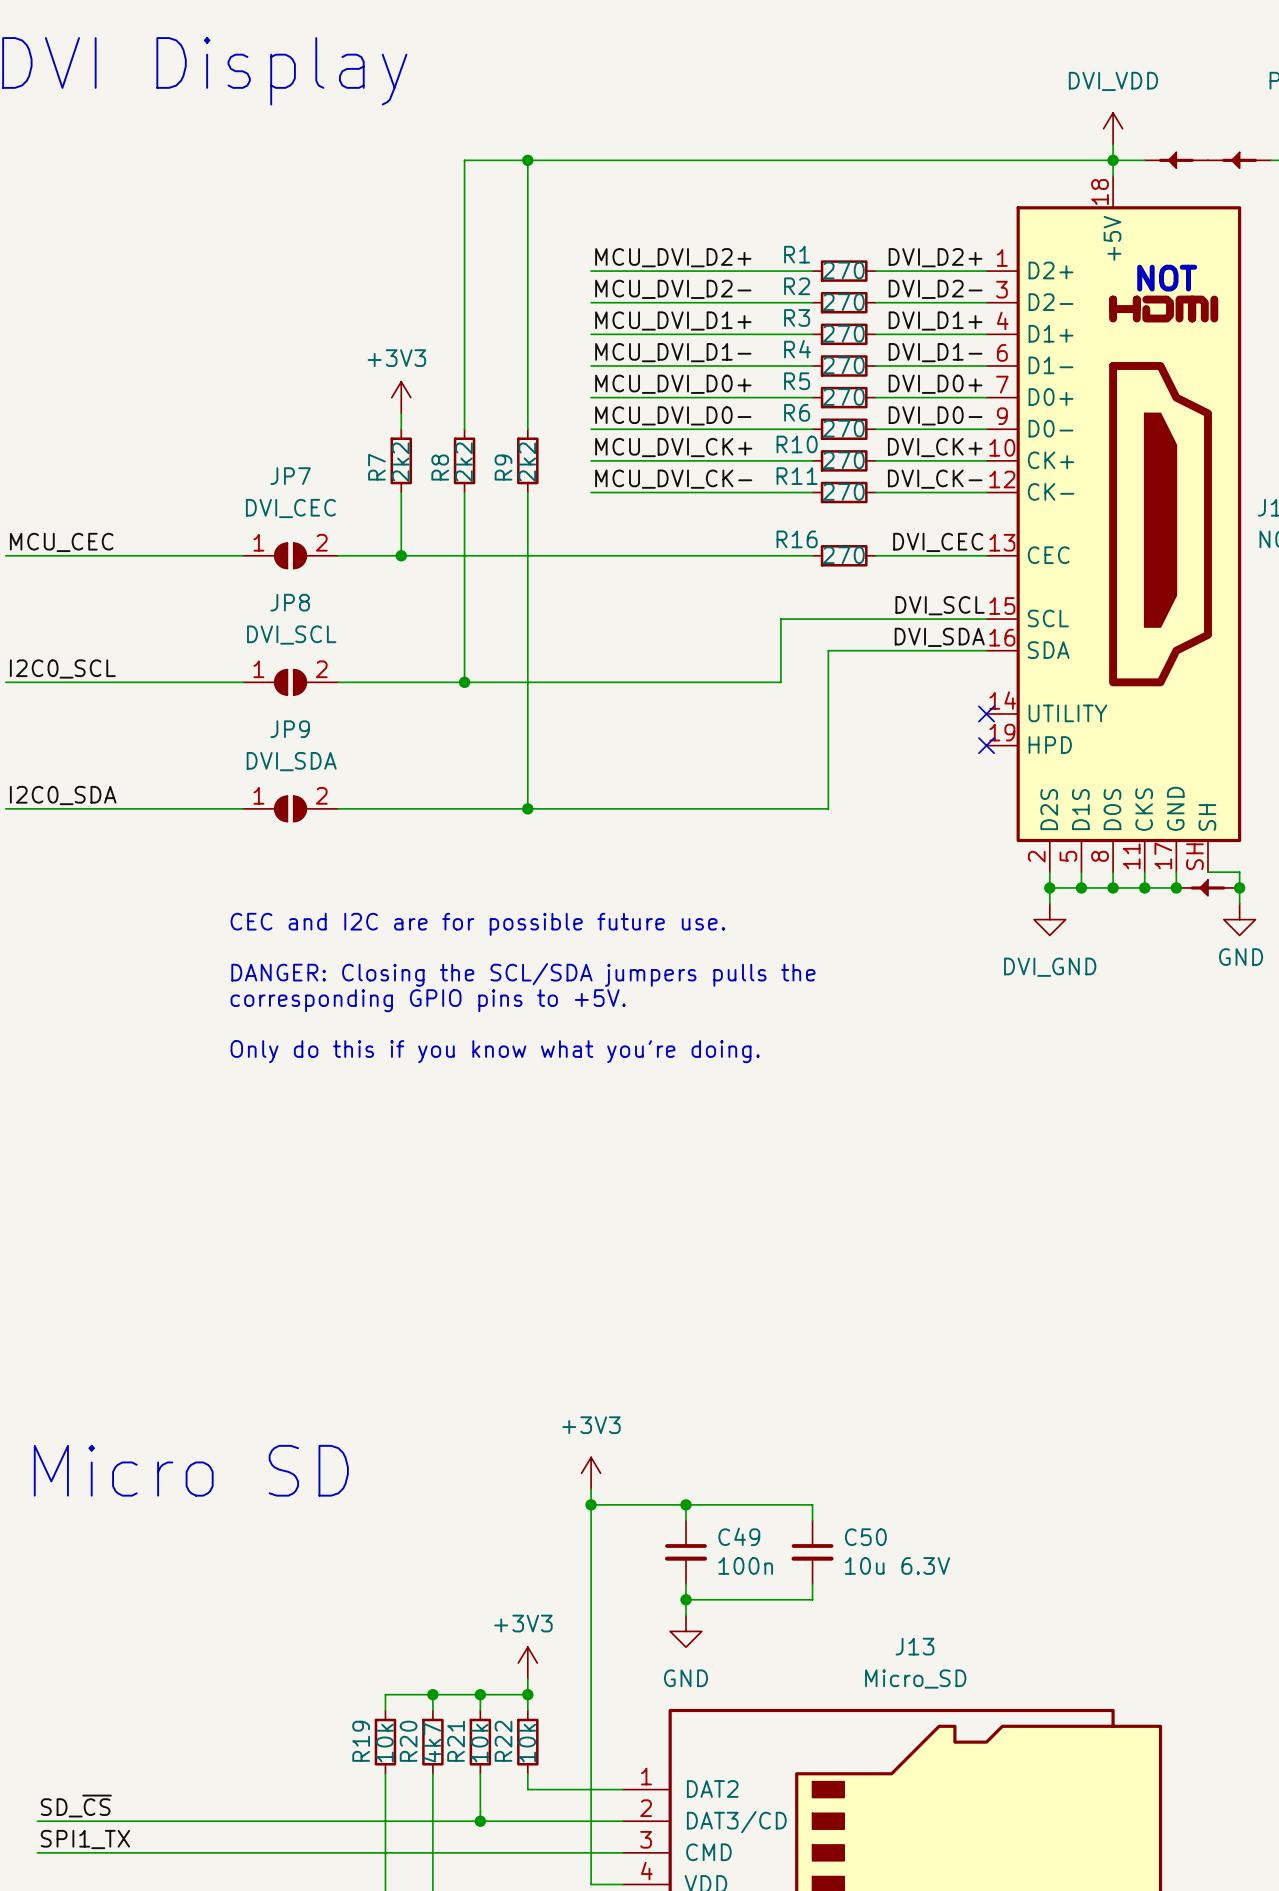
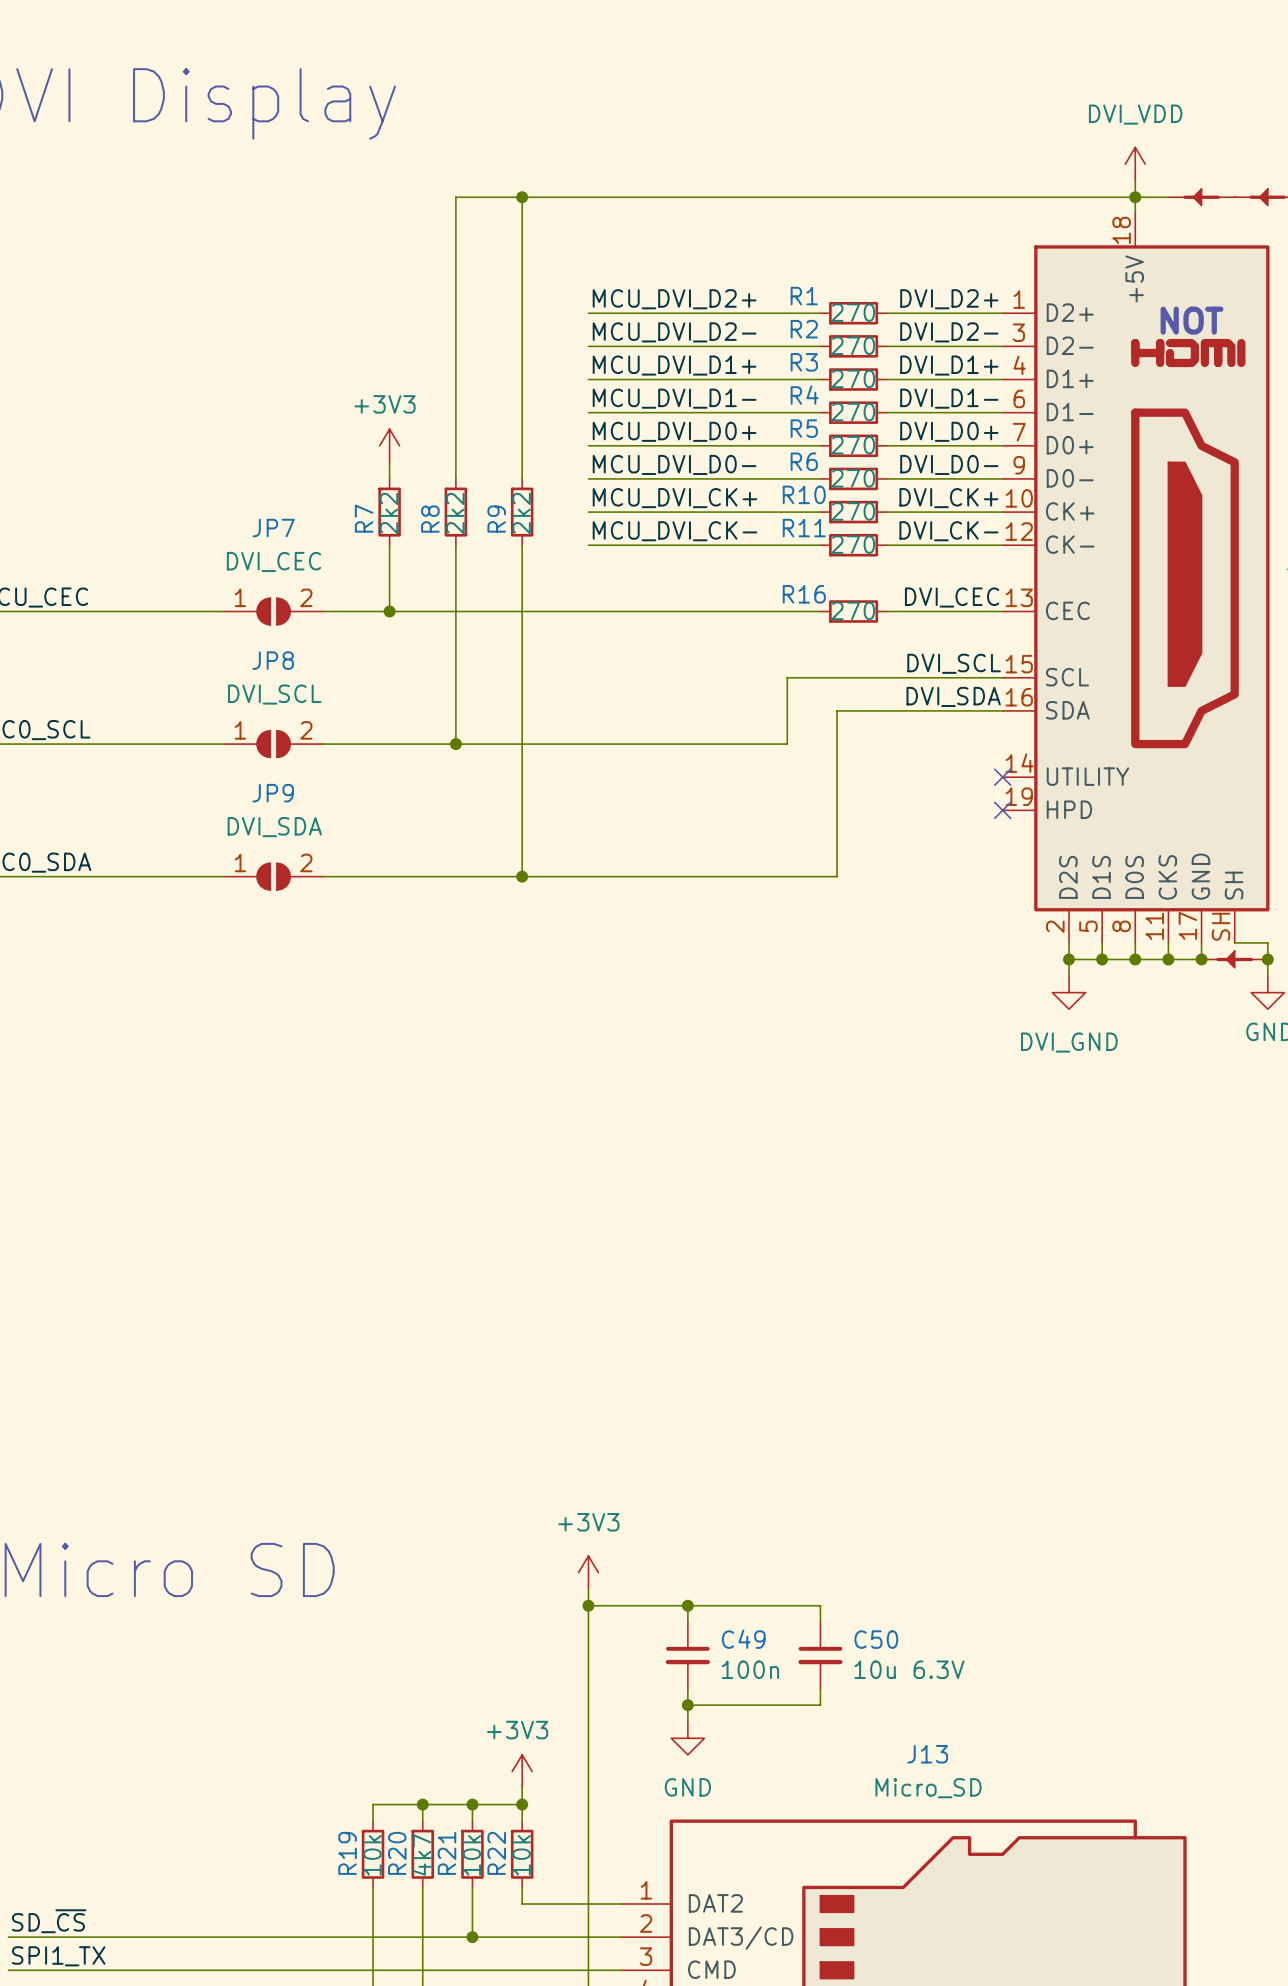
text: CEC and I2C are for possible future use. (477, 924) -> none
text: DANGER: Closing the SCL/SDA jumpers pulls the (523, 974) -> none
text: corresponding GPIO pins to +5V. (428, 1000) -> none
text: Only do this if you know what you're doing. (495, 1051) -> none

